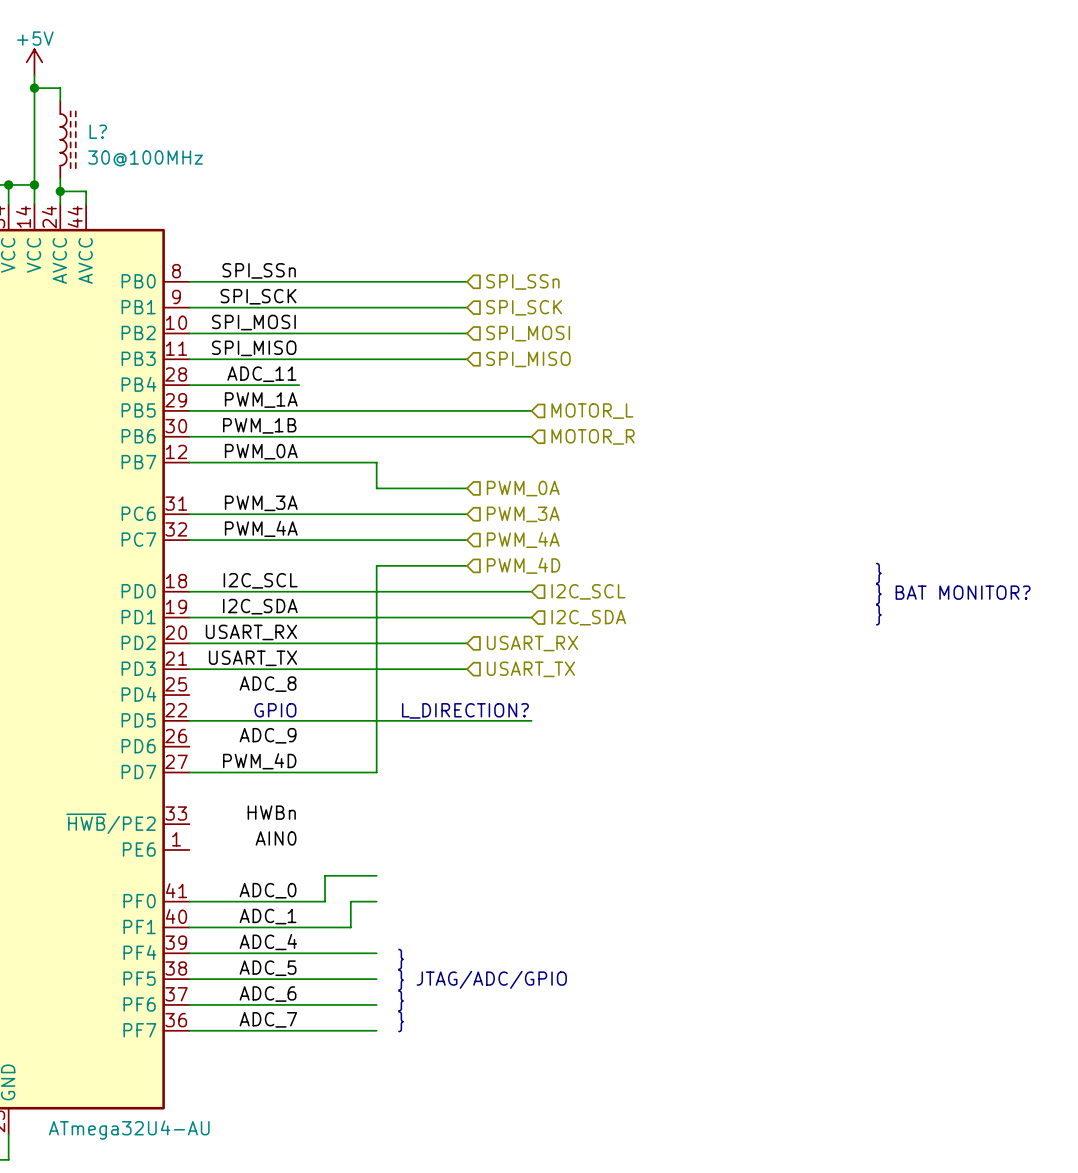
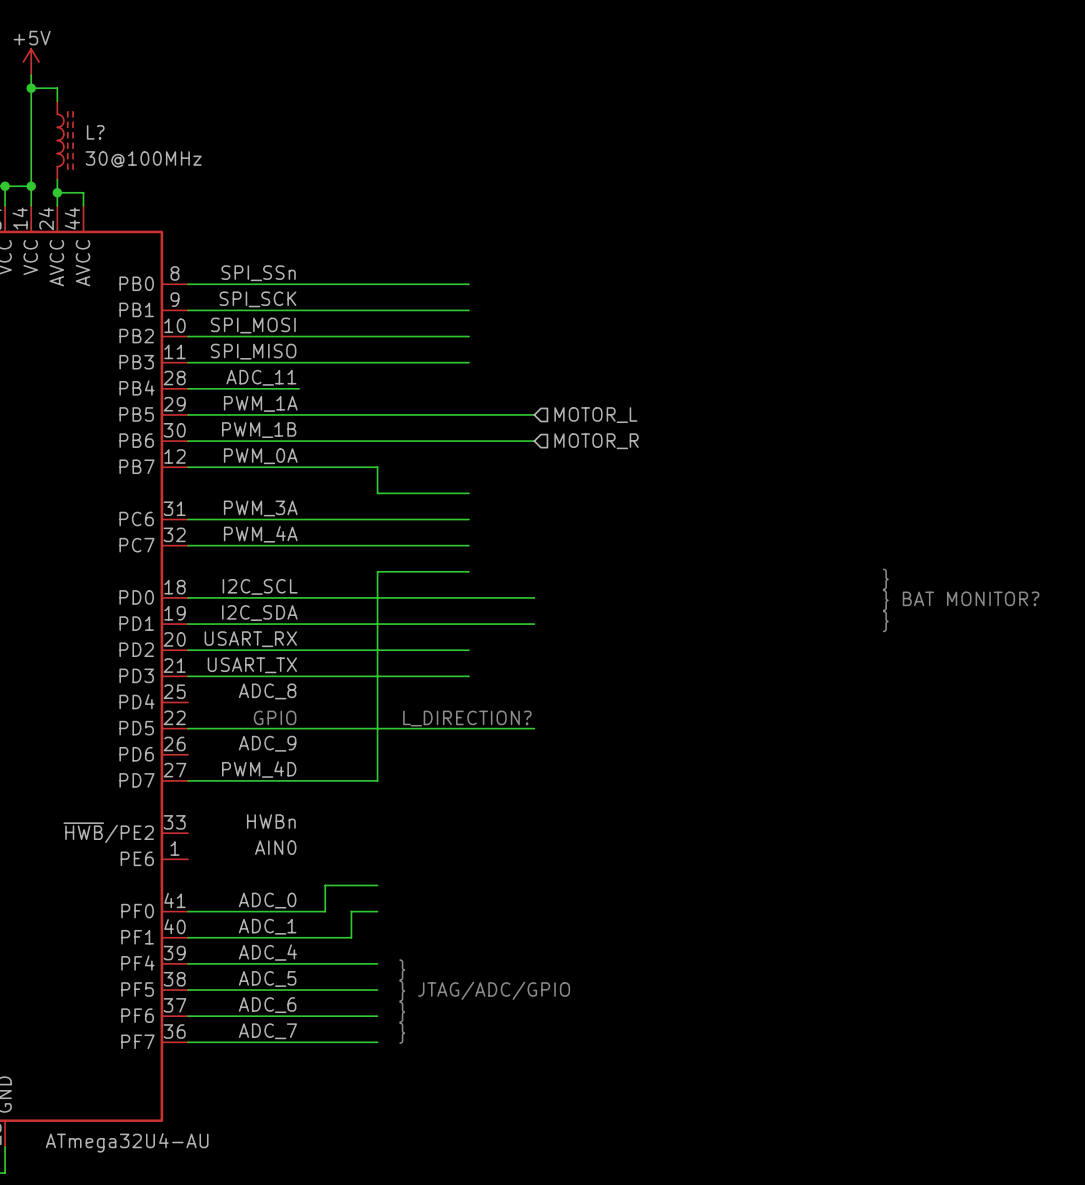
hierarchical label: SPI_SSn (522, 281) -> none
hierarchical label: SPI_SCK (524, 307) -> none
hierarchical label: SPI_MOSI (528, 333) -> none
hierarchical label: SPI_MISO (528, 359) -> none
hierarchical label: PWM_0A (523, 488) -> none
hierarchical label: PWM_3A (523, 514) -> none
hierarchical label: PWM_4A (523, 539) -> none
hierarchical label: PWM_4D (523, 565) -> none
hierarchical label: I2C_SCL (588, 591) -> none
hierarchical label: I2C_SDA (588, 617) -> none
hierarchical label: USART_RX (532, 643) -> none
hierarchical label: USART_TX (530, 669) -> none

